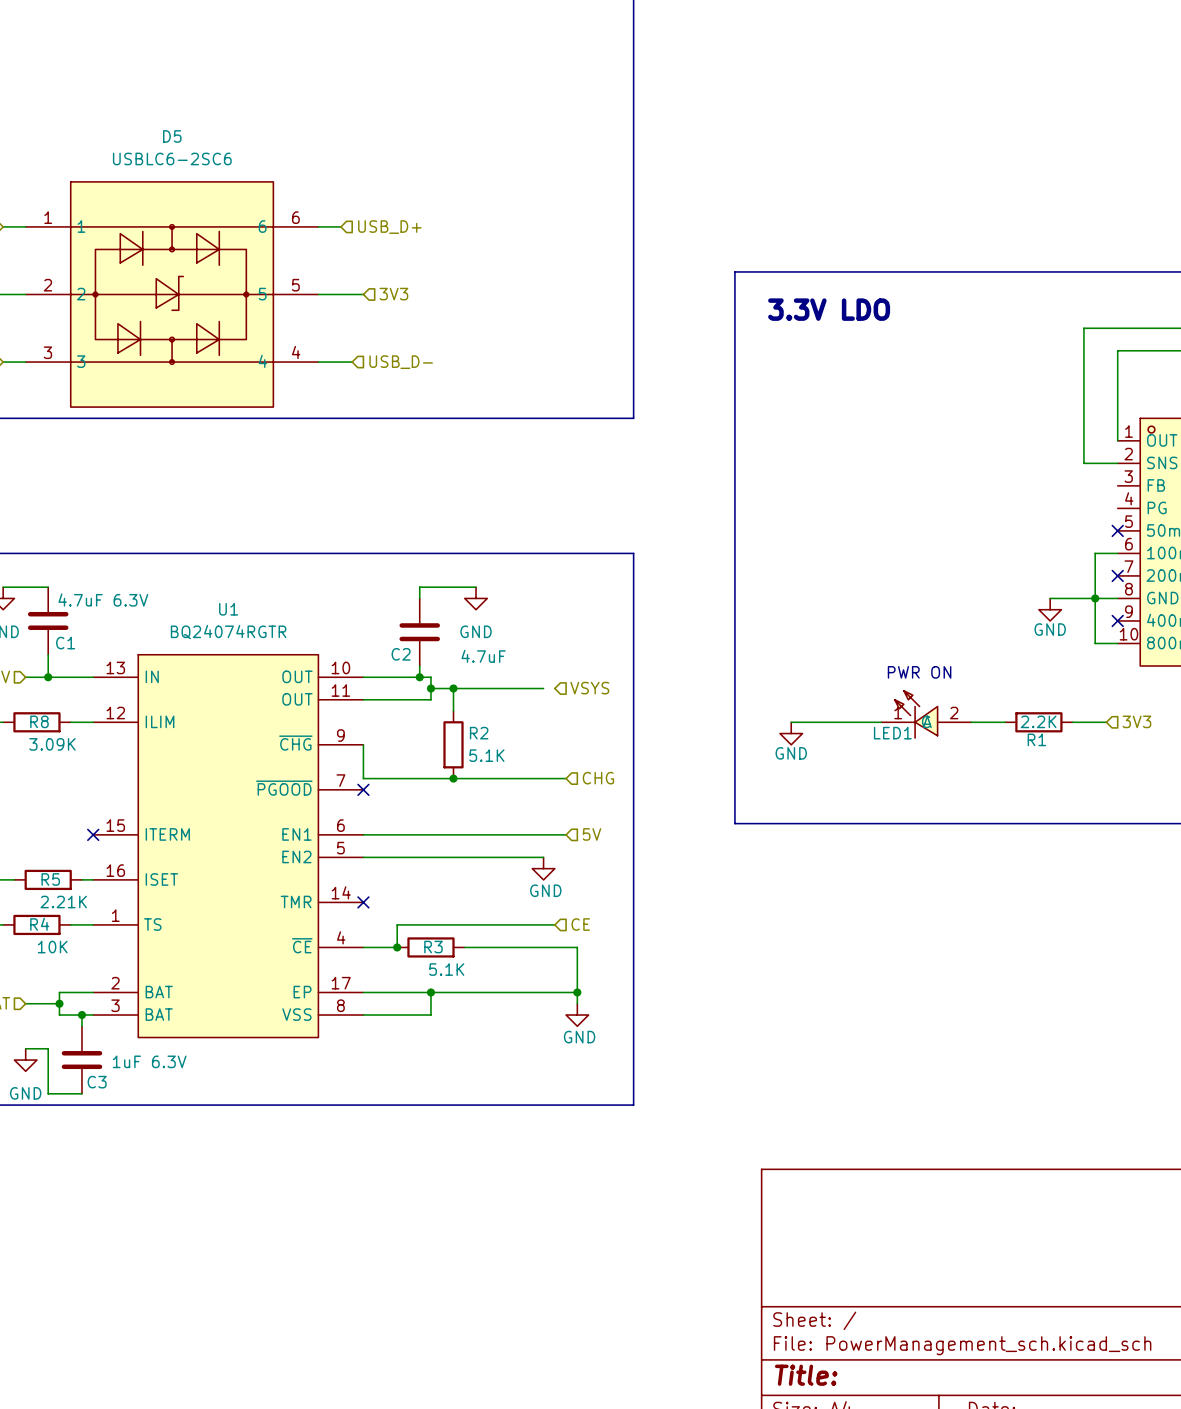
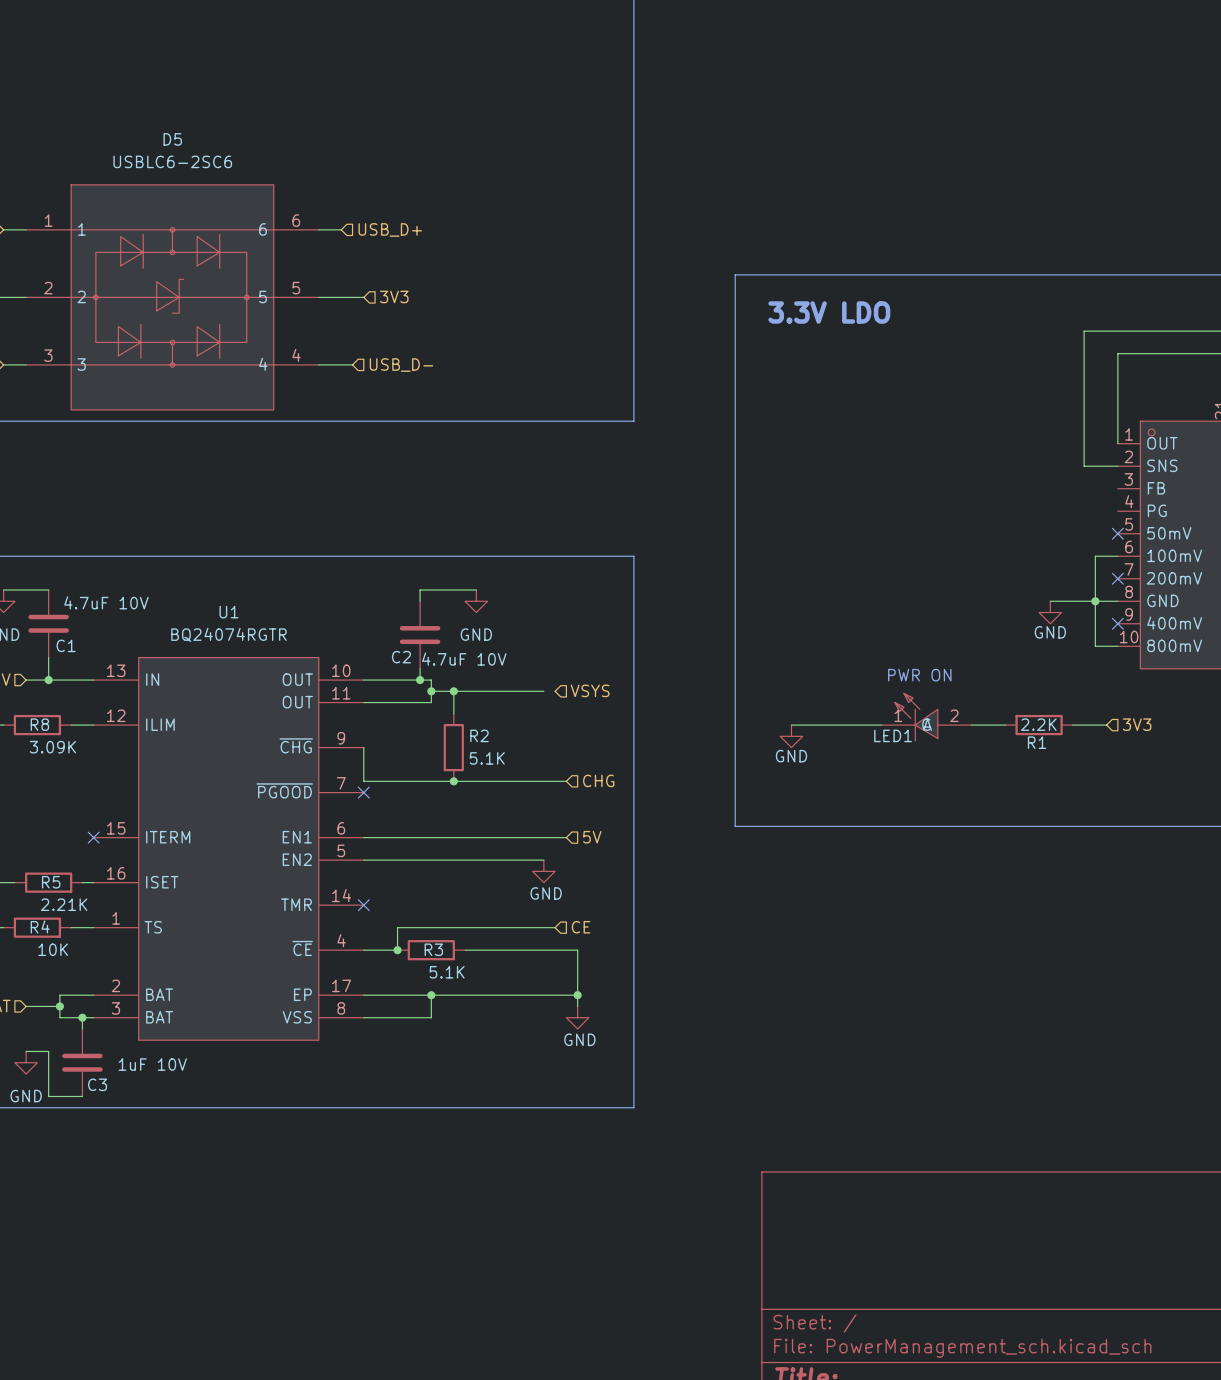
C1 value: 4.7uF 6.3V (103, 600) -> 4.7uF 10V (106, 602)
C2 value: 4.7uF (483, 656) -> 4.7uF 10V (464, 659)
C3 value: 1uF 6.3V (149, 1061) -> 1uF 10V (152, 1064)

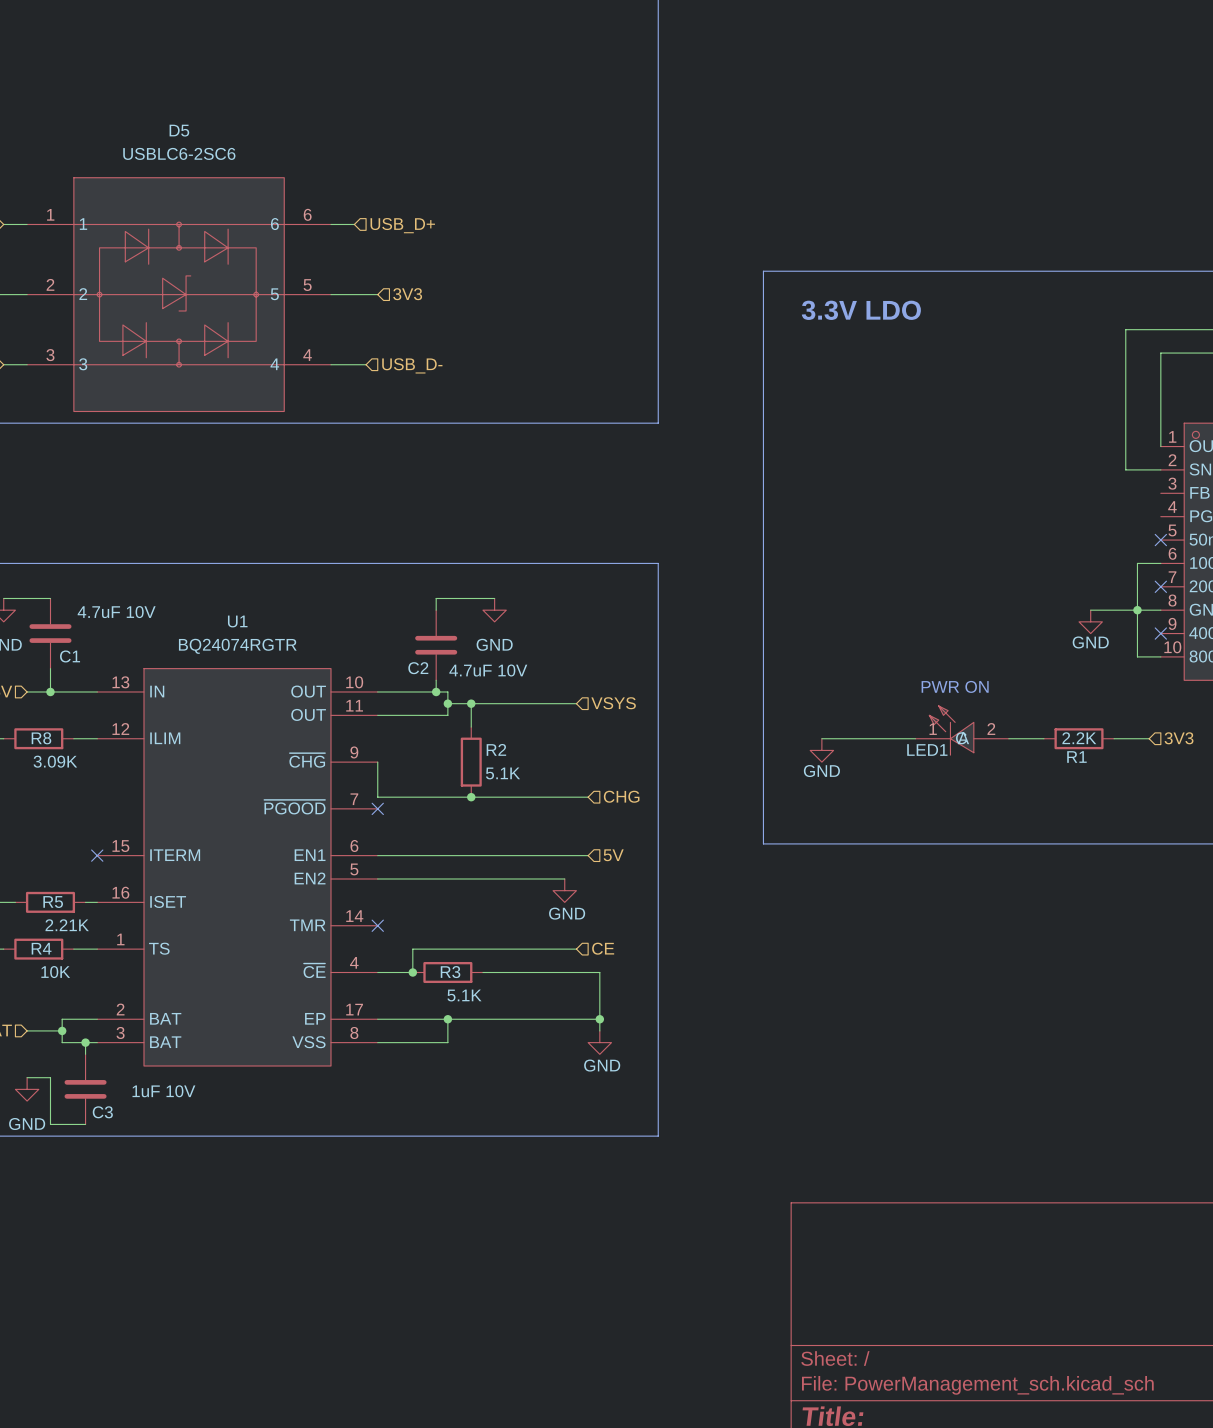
wire: none -> (564, 703) (576, 703)

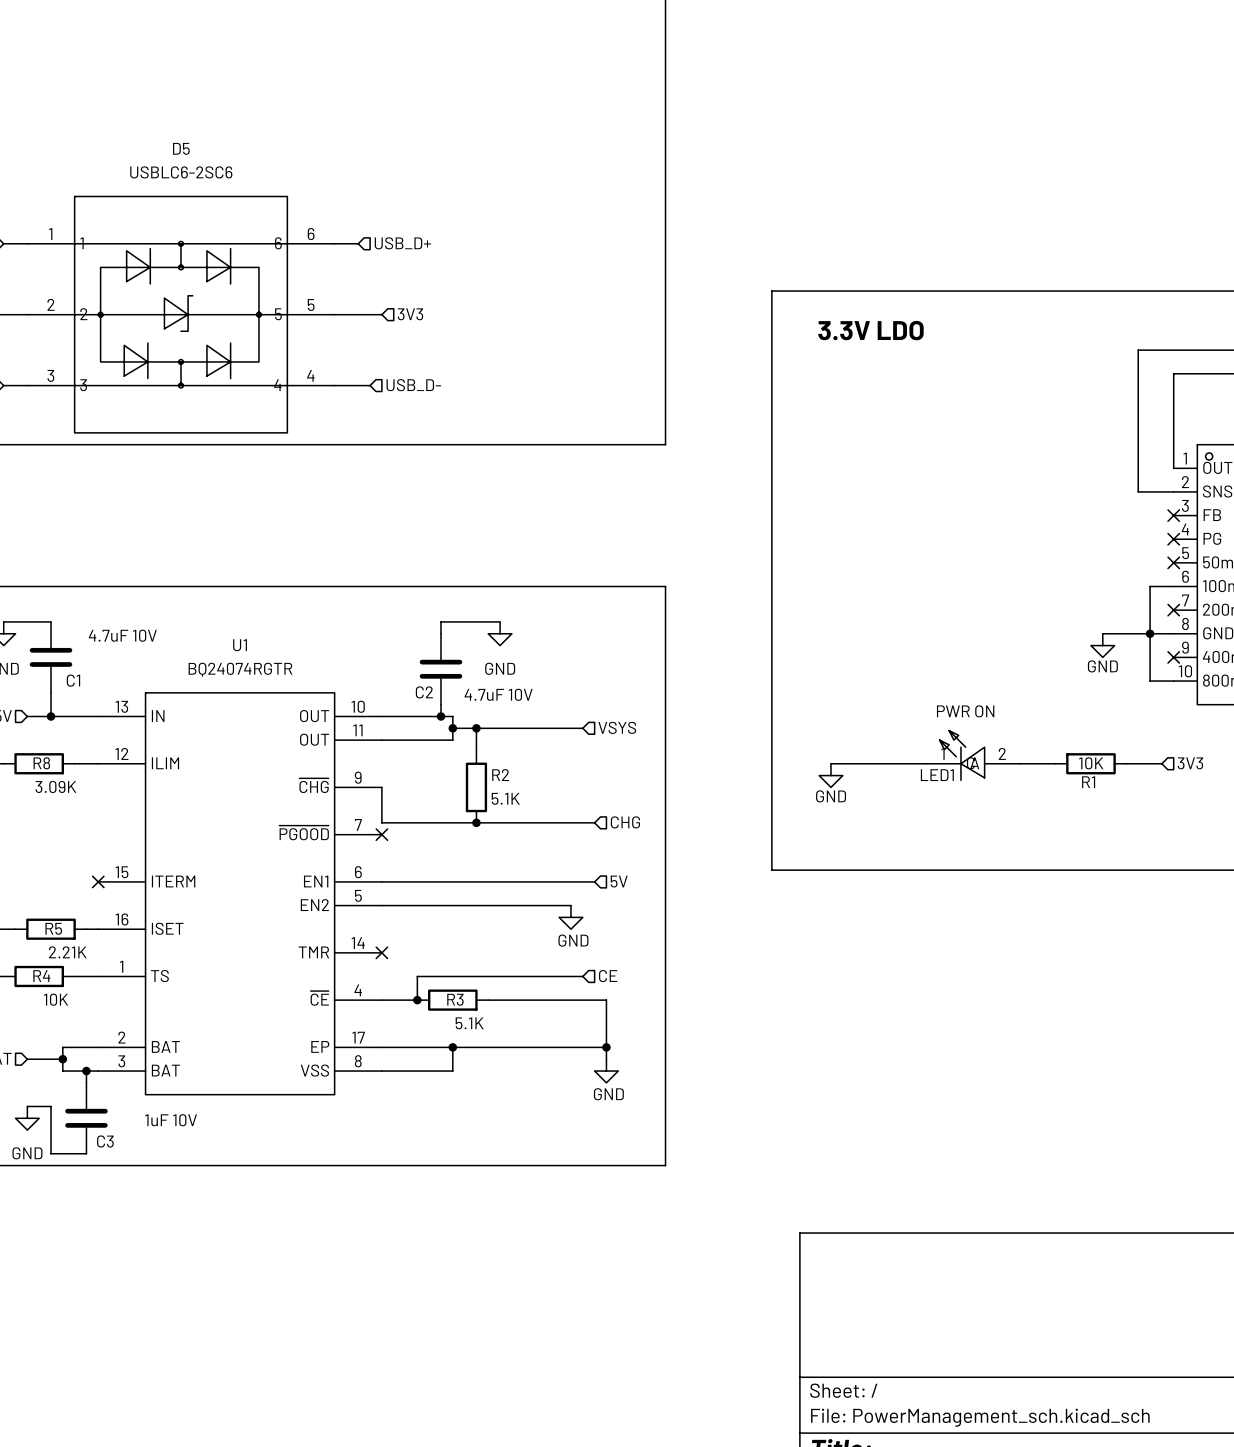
no-connect mark: none -> (1173, 515)
no-connect mark: none -> (1173, 539)
R1 value: 2.2K (1079, 738) -> 10K (1091, 763)

